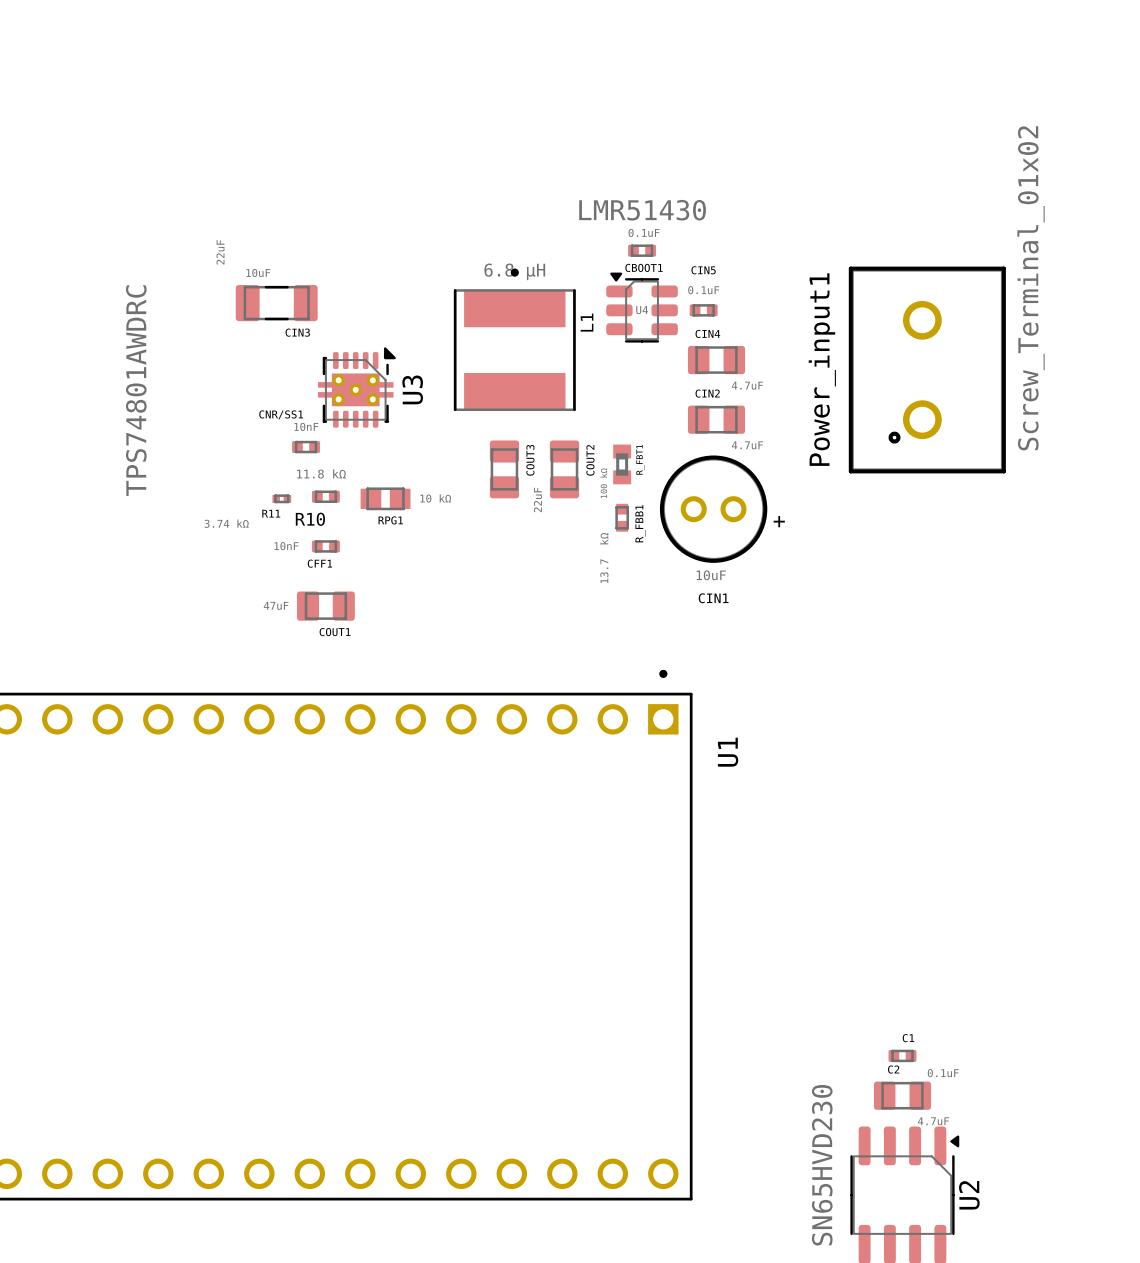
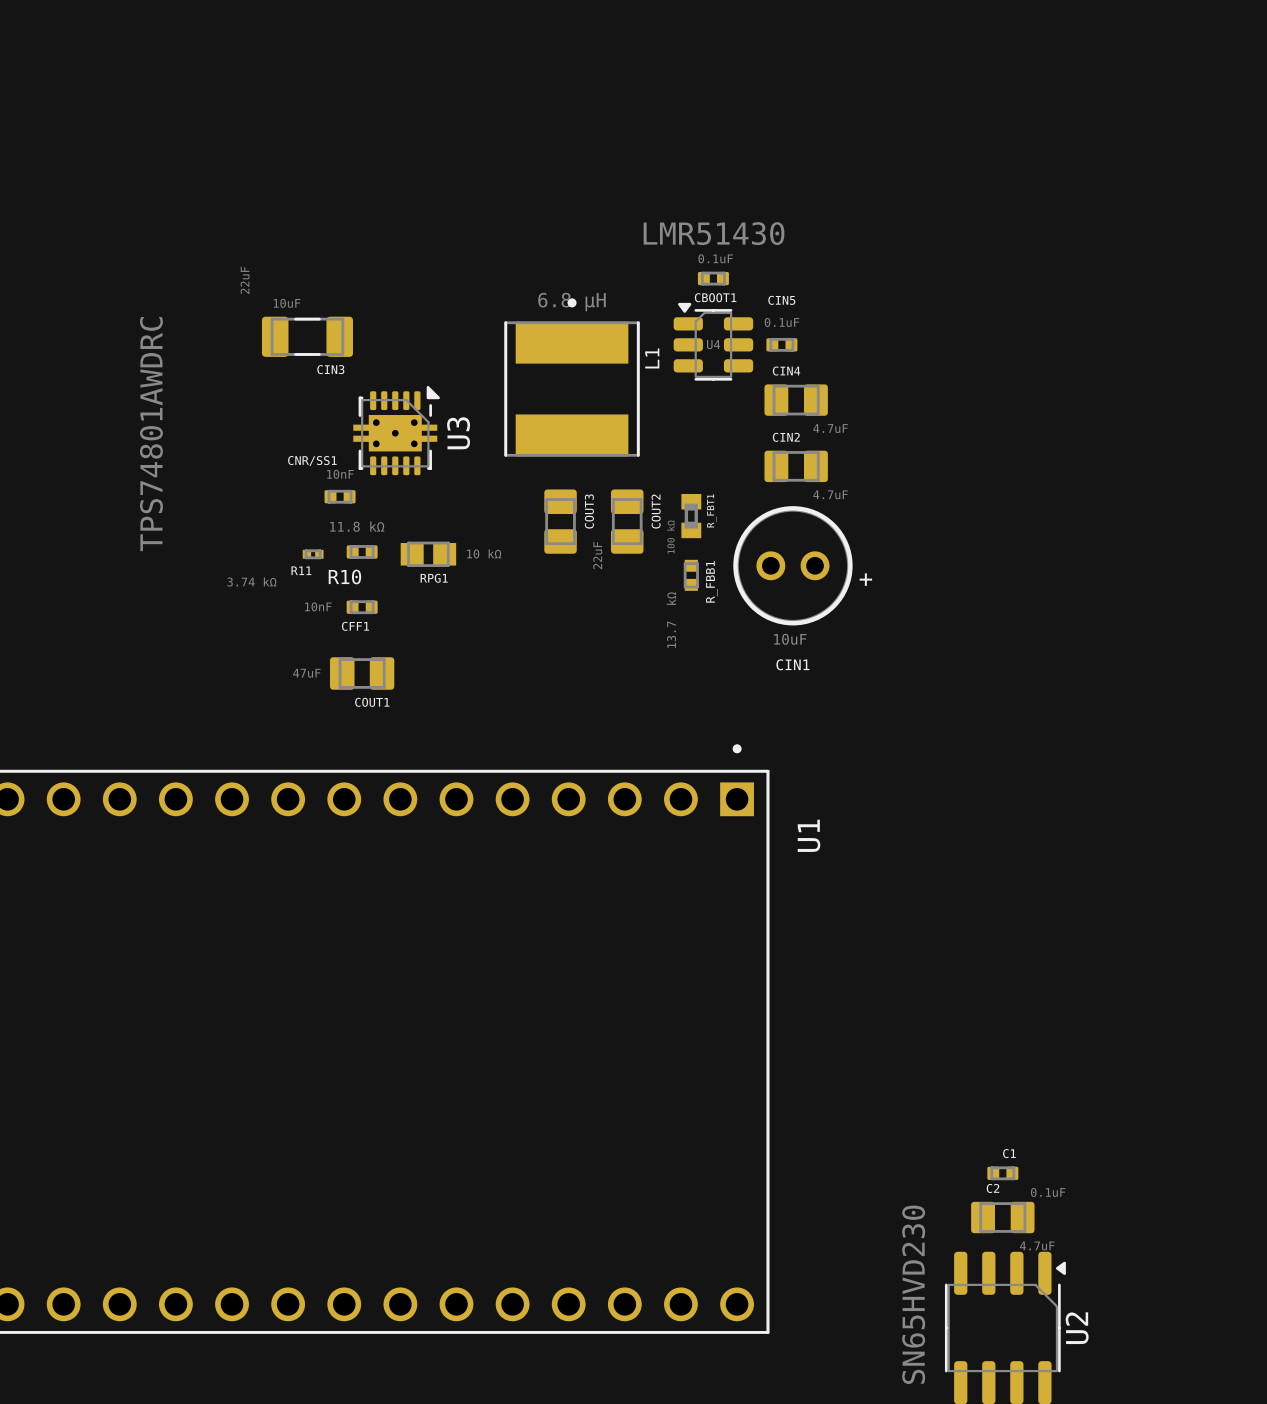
Power_input1: Screw_Terminal_01x02 (927, 370) -> none

